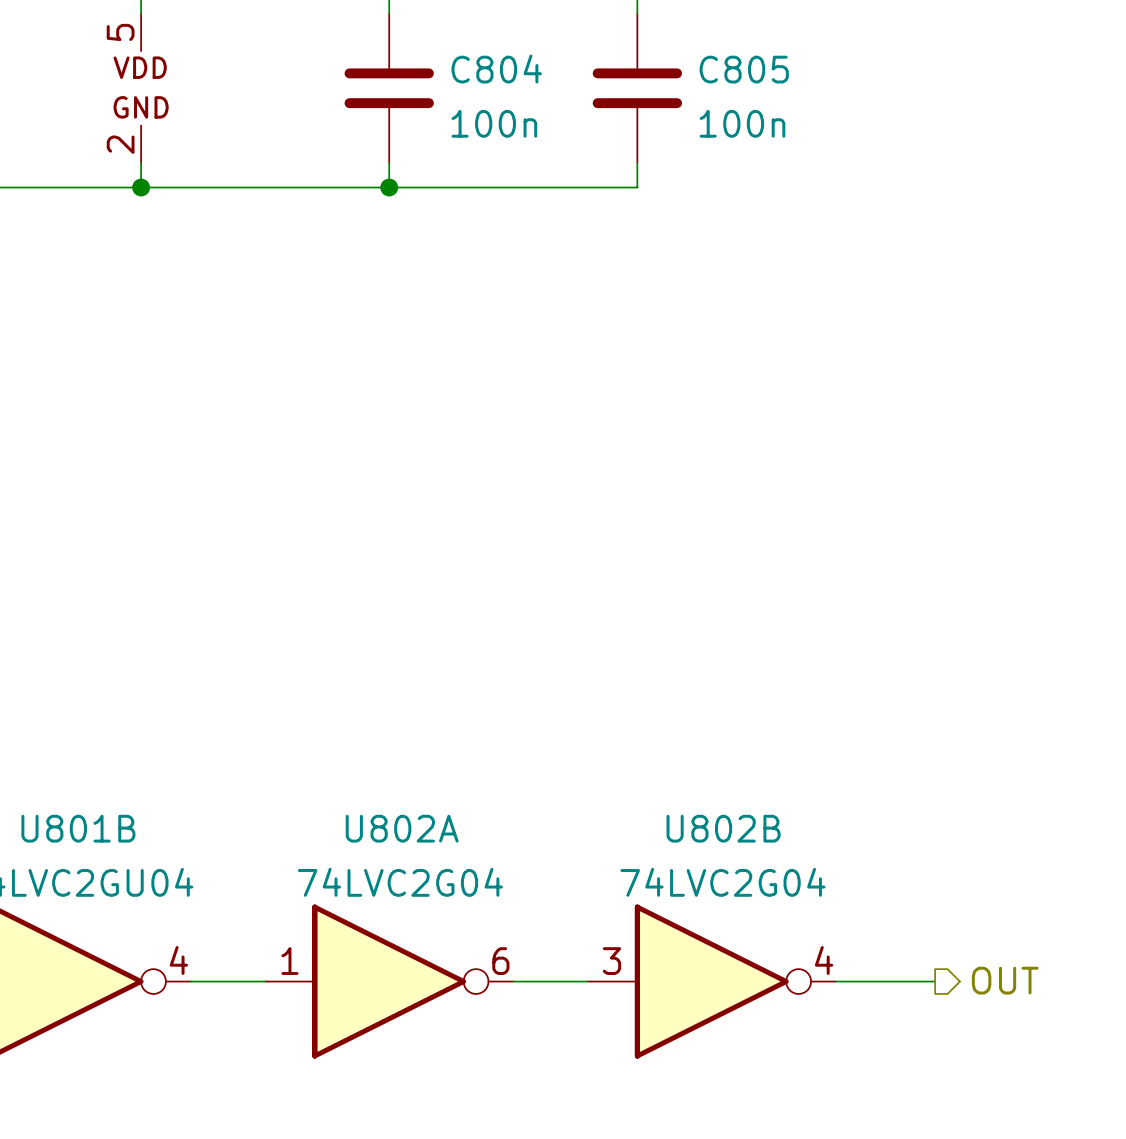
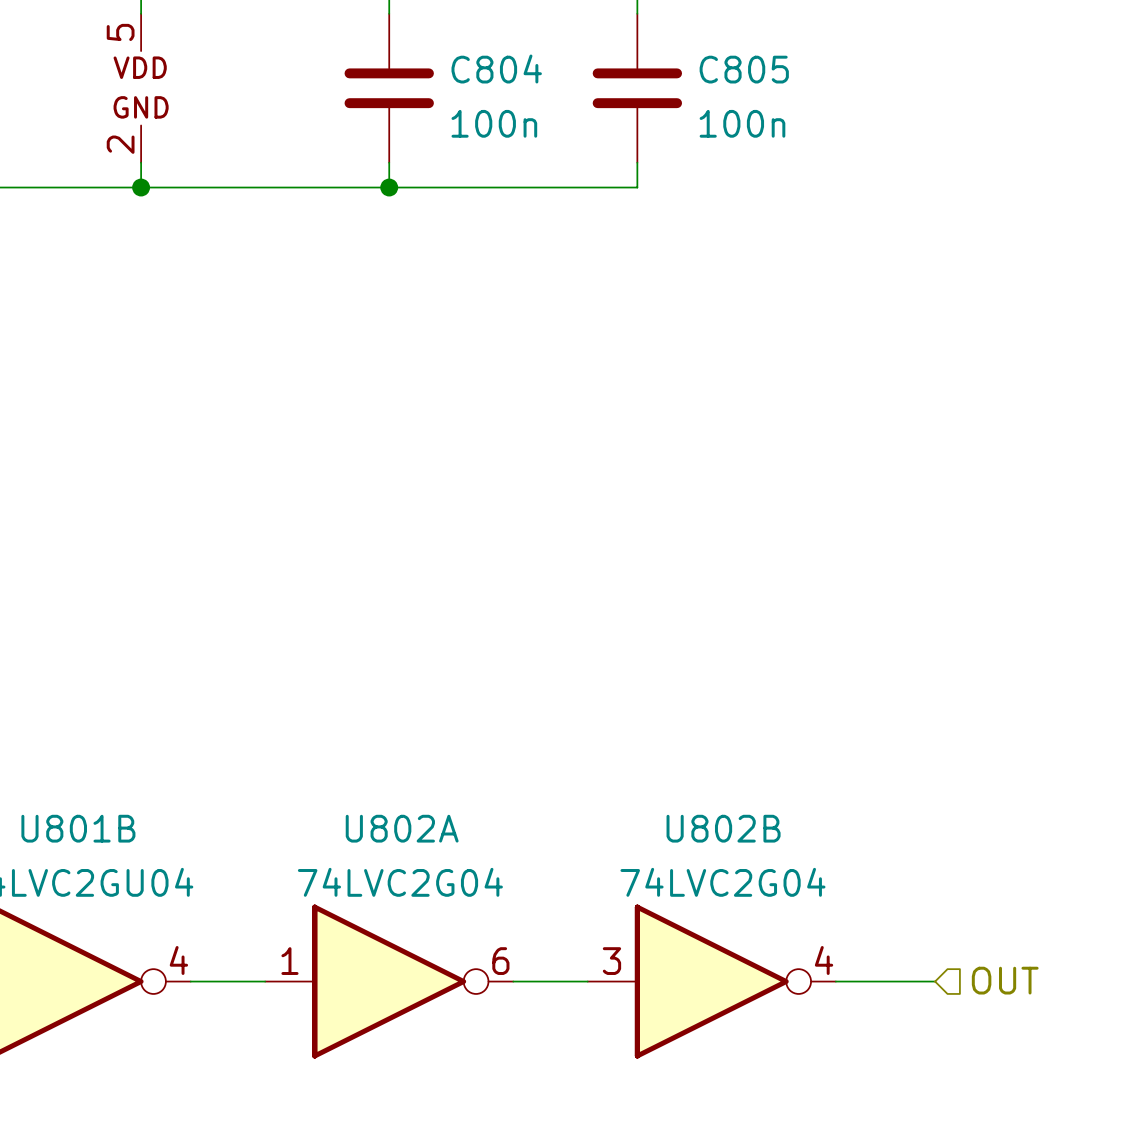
hierarchical label shape: output (1005, 980) -> input (1005, 980)

